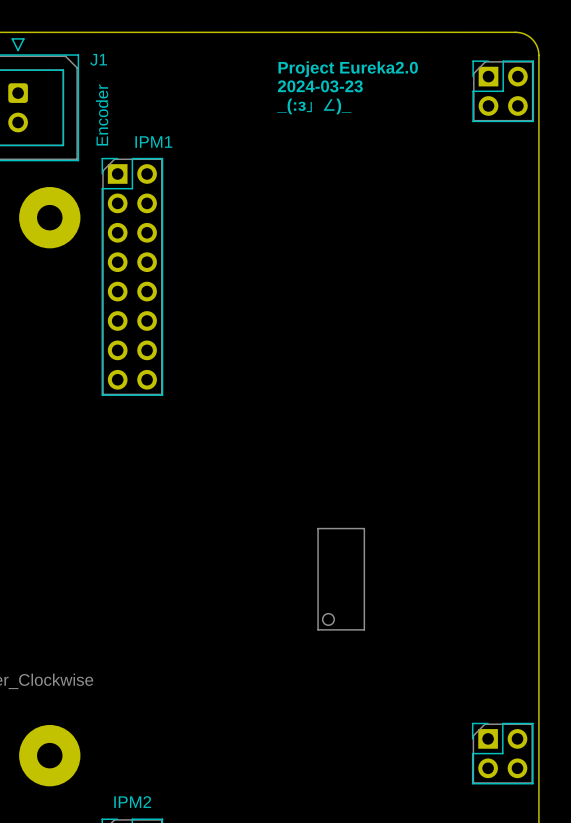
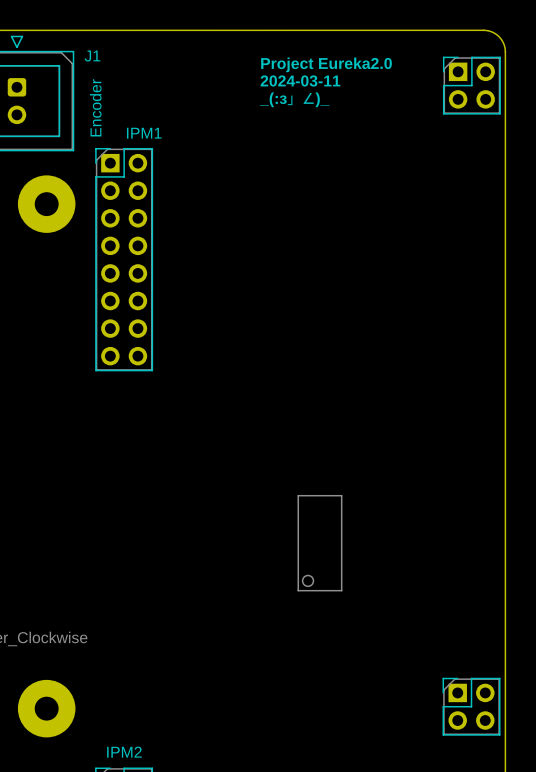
text: 2024-03-23 (320, 86) -> 2024-03-11 (300, 80)

